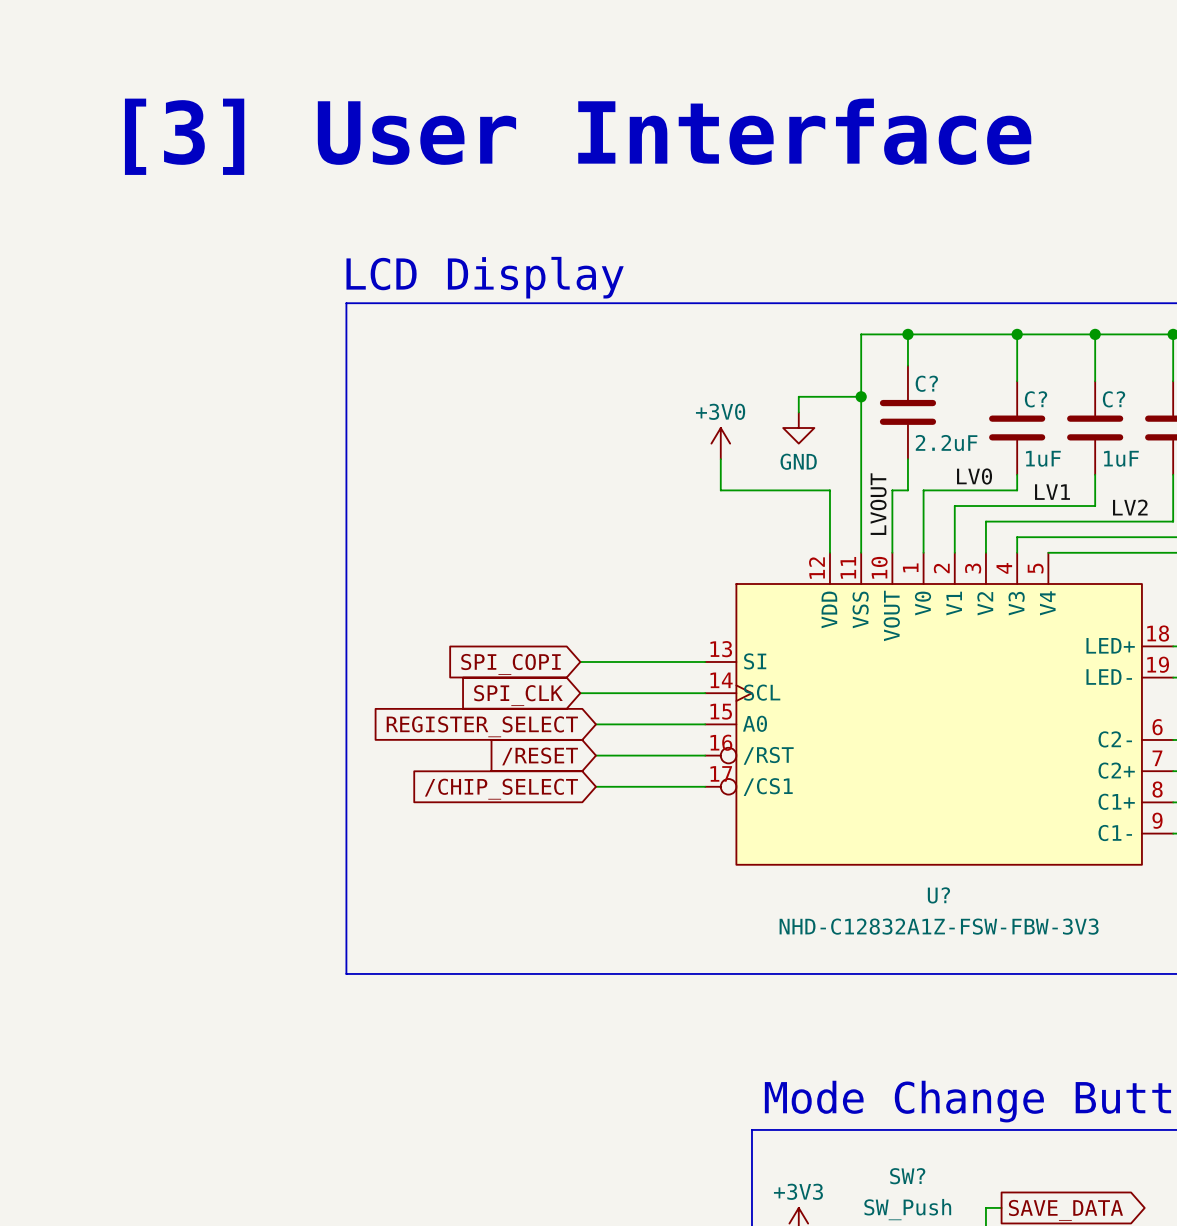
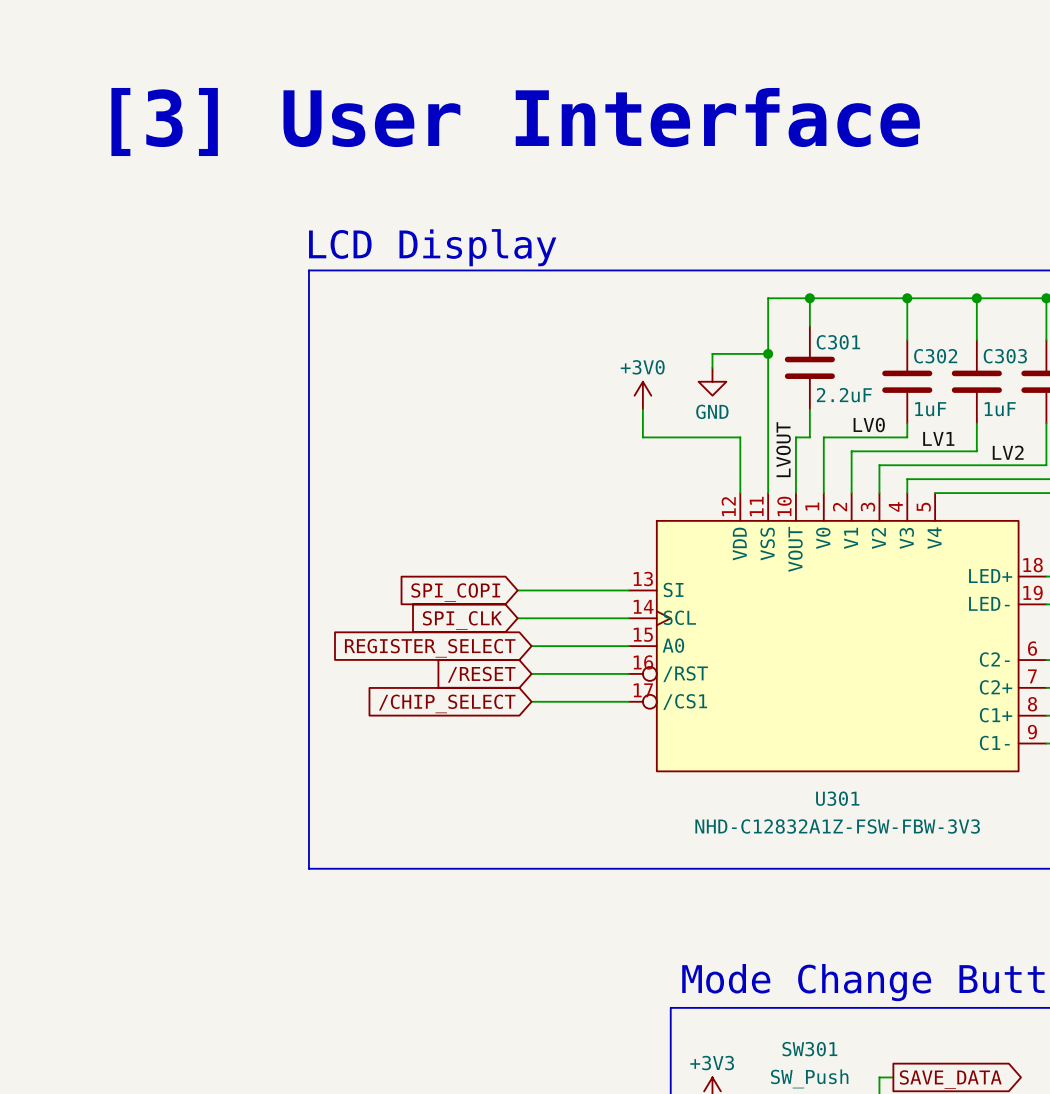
C? name: C? (926, 383) -> C301 (838, 342)
C? name: C? (1036, 399) -> C302 (935, 356)
C? name: C? (1114, 399) -> C303 (1005, 356)
U? name: U? (938, 895) -> U301 (837, 798)
SW? name: SW? (907, 1176) -> SW301 (809, 1049)

